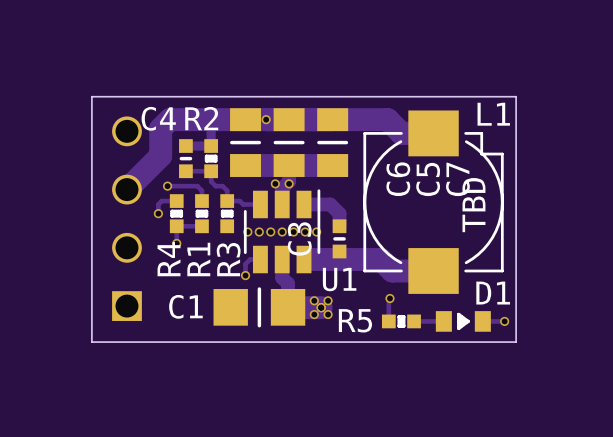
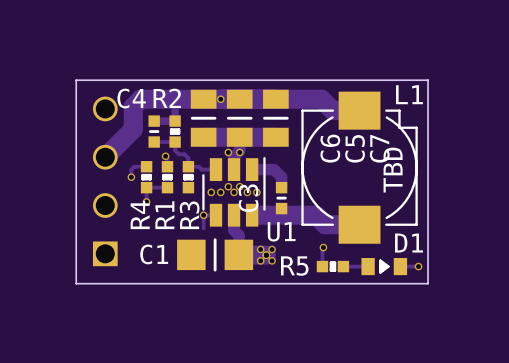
track: (167, 186) (197, 186) (199, 188) -> none
via position: (167, 186) -> (165, 156)
via: none -> (228, 186)
via: none -> (239, 186)
via: (247, 232) -> none
via: none -> (211, 192)
via: (259, 232) -> none
via: none -> (220, 192)
via: (270, 232) -> none
via: (293, 232) -> none
via: none -> (247, 192)
via: (305, 232) -> none
via: none -> (256, 192)
via: (316, 232) -> none
via: none -> (203, 215)
via: (245, 275) -> none

